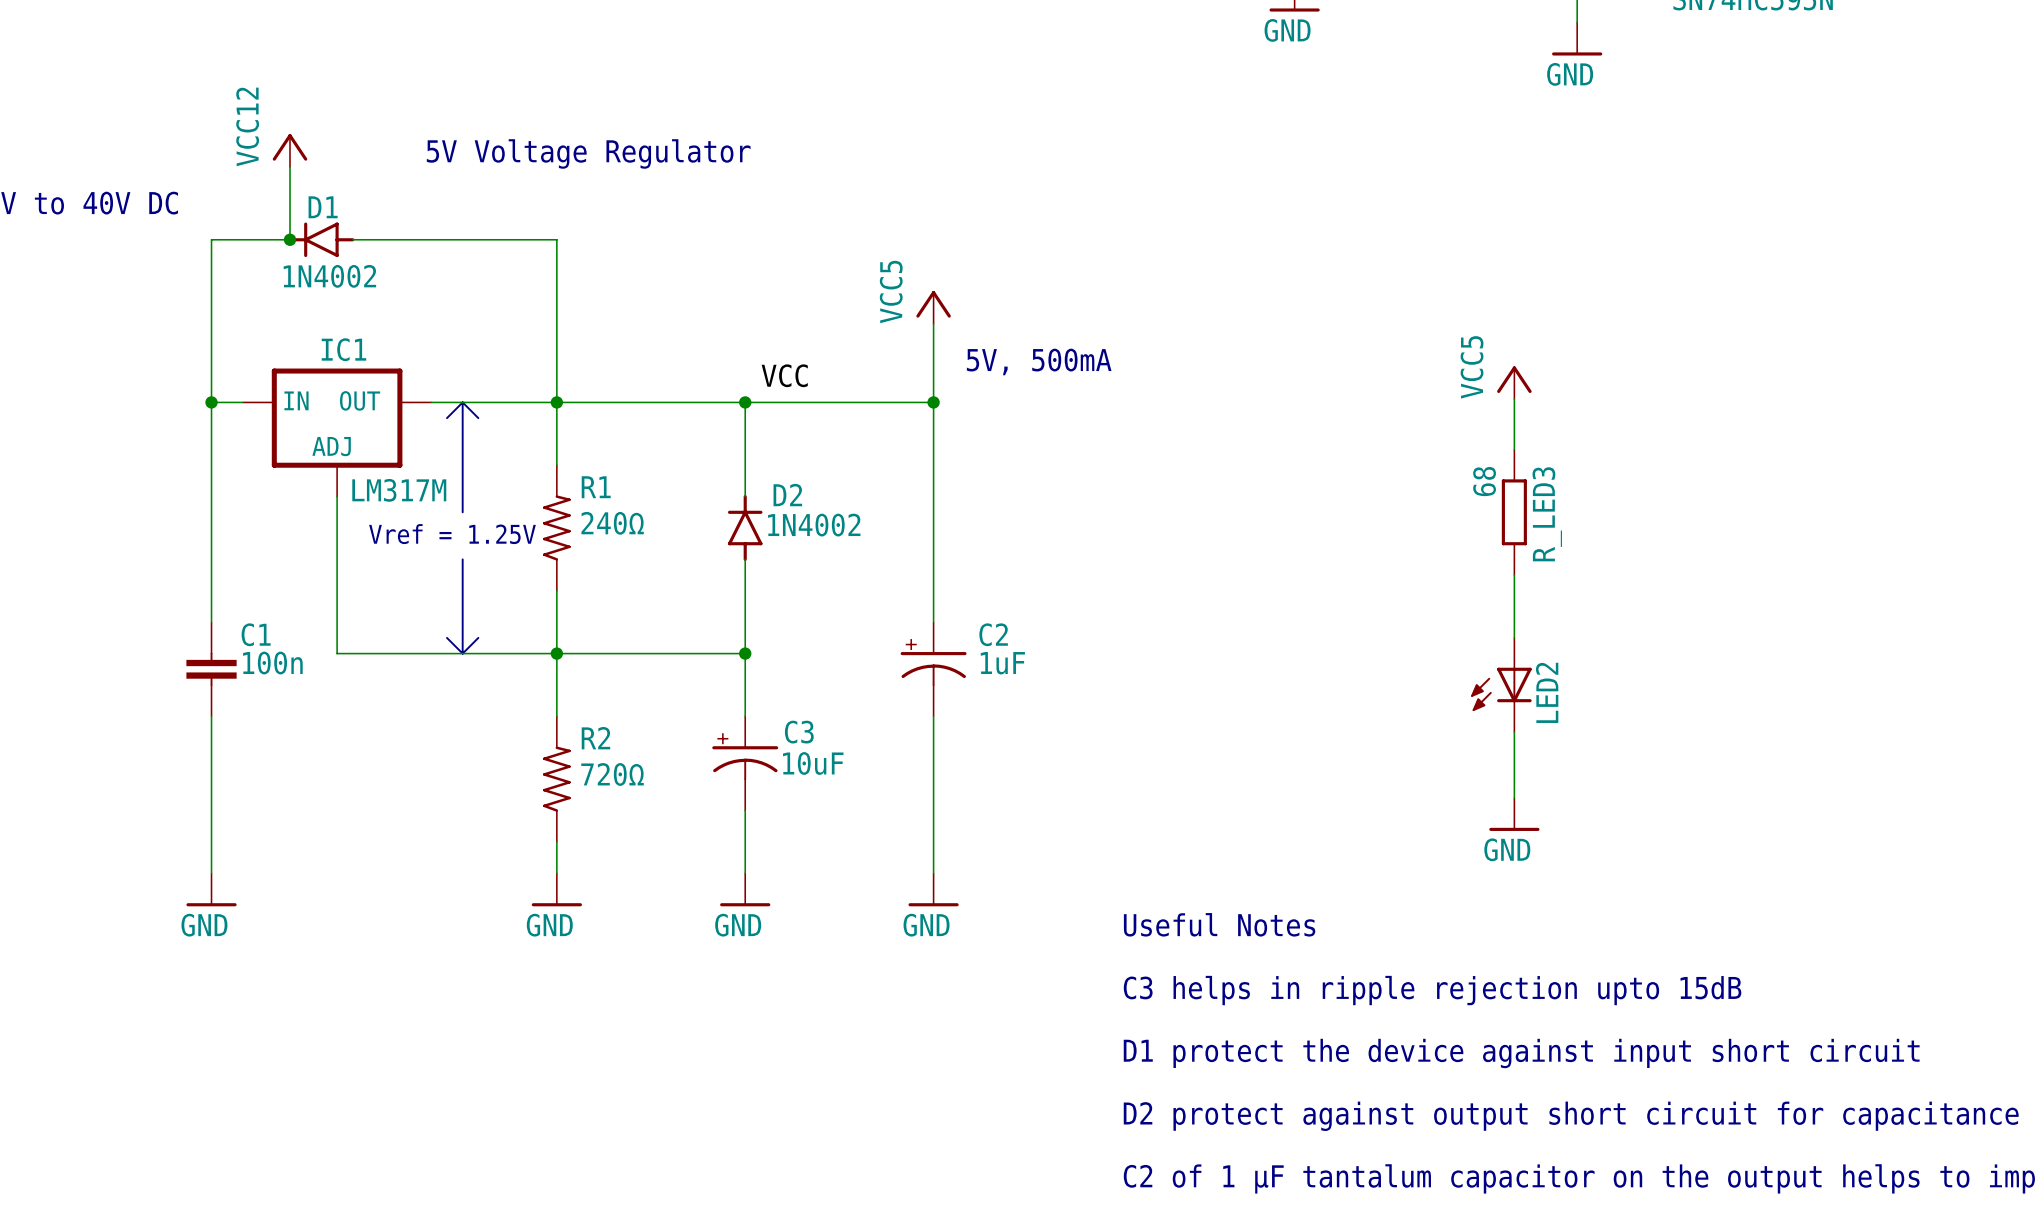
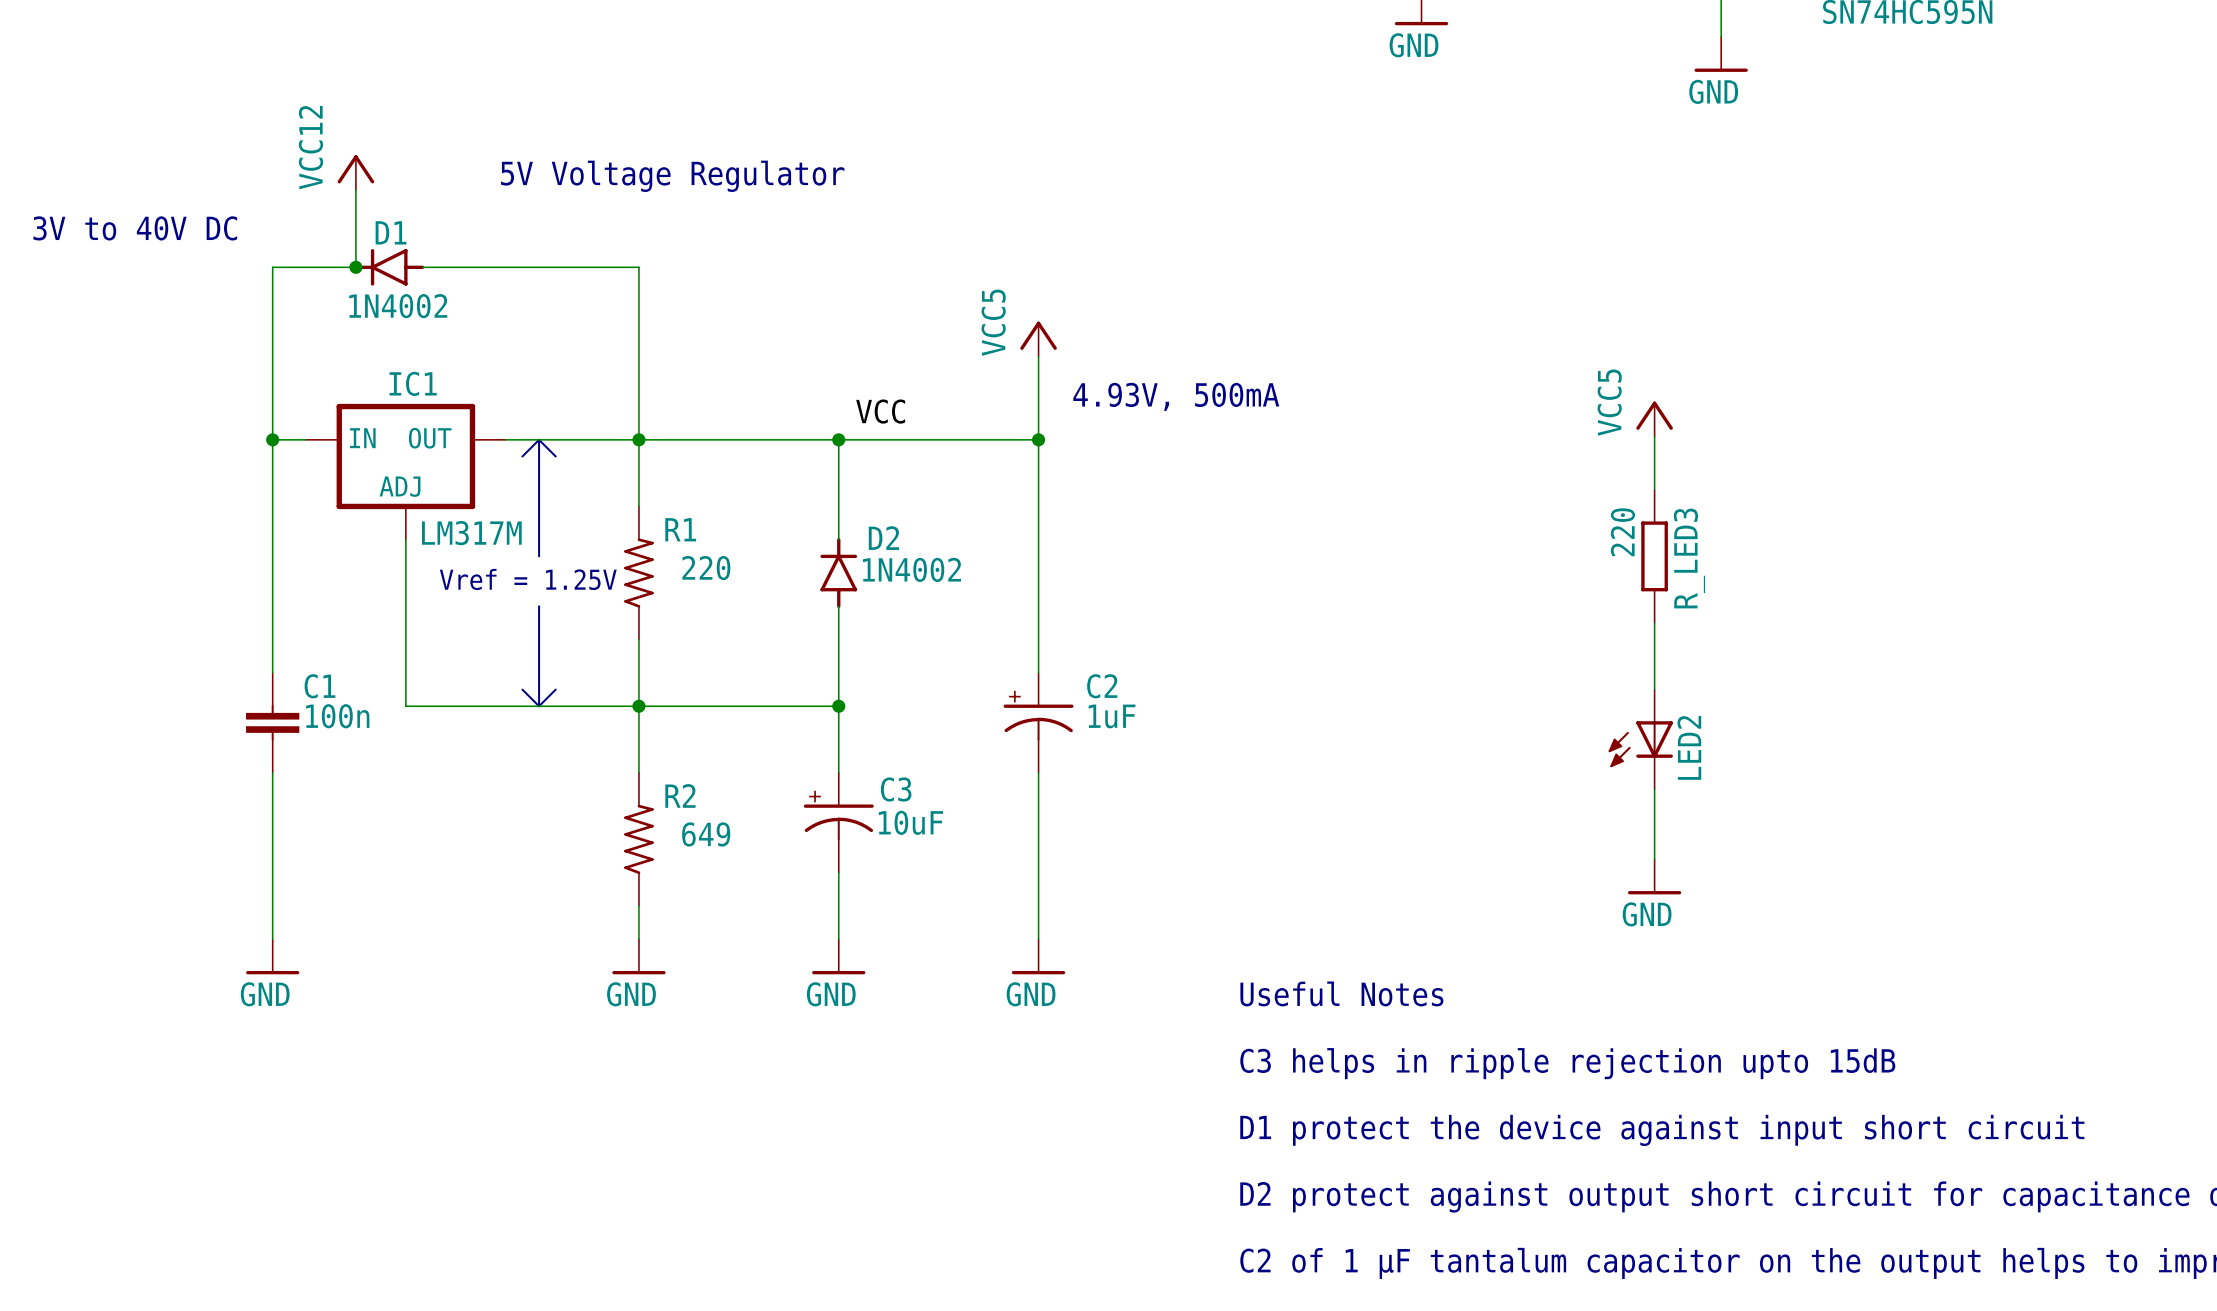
text: 5V, 500mA (1039, 361) -> 4.93V, 500mA (1176, 396)
R_LED3 value: 68 (1484, 481) -> 220 (1622, 532)
R1 value: 240Ω (612, 523) -> 220 (706, 568)
R2 value: 720Ω (612, 774) -> 649 (706, 834)

